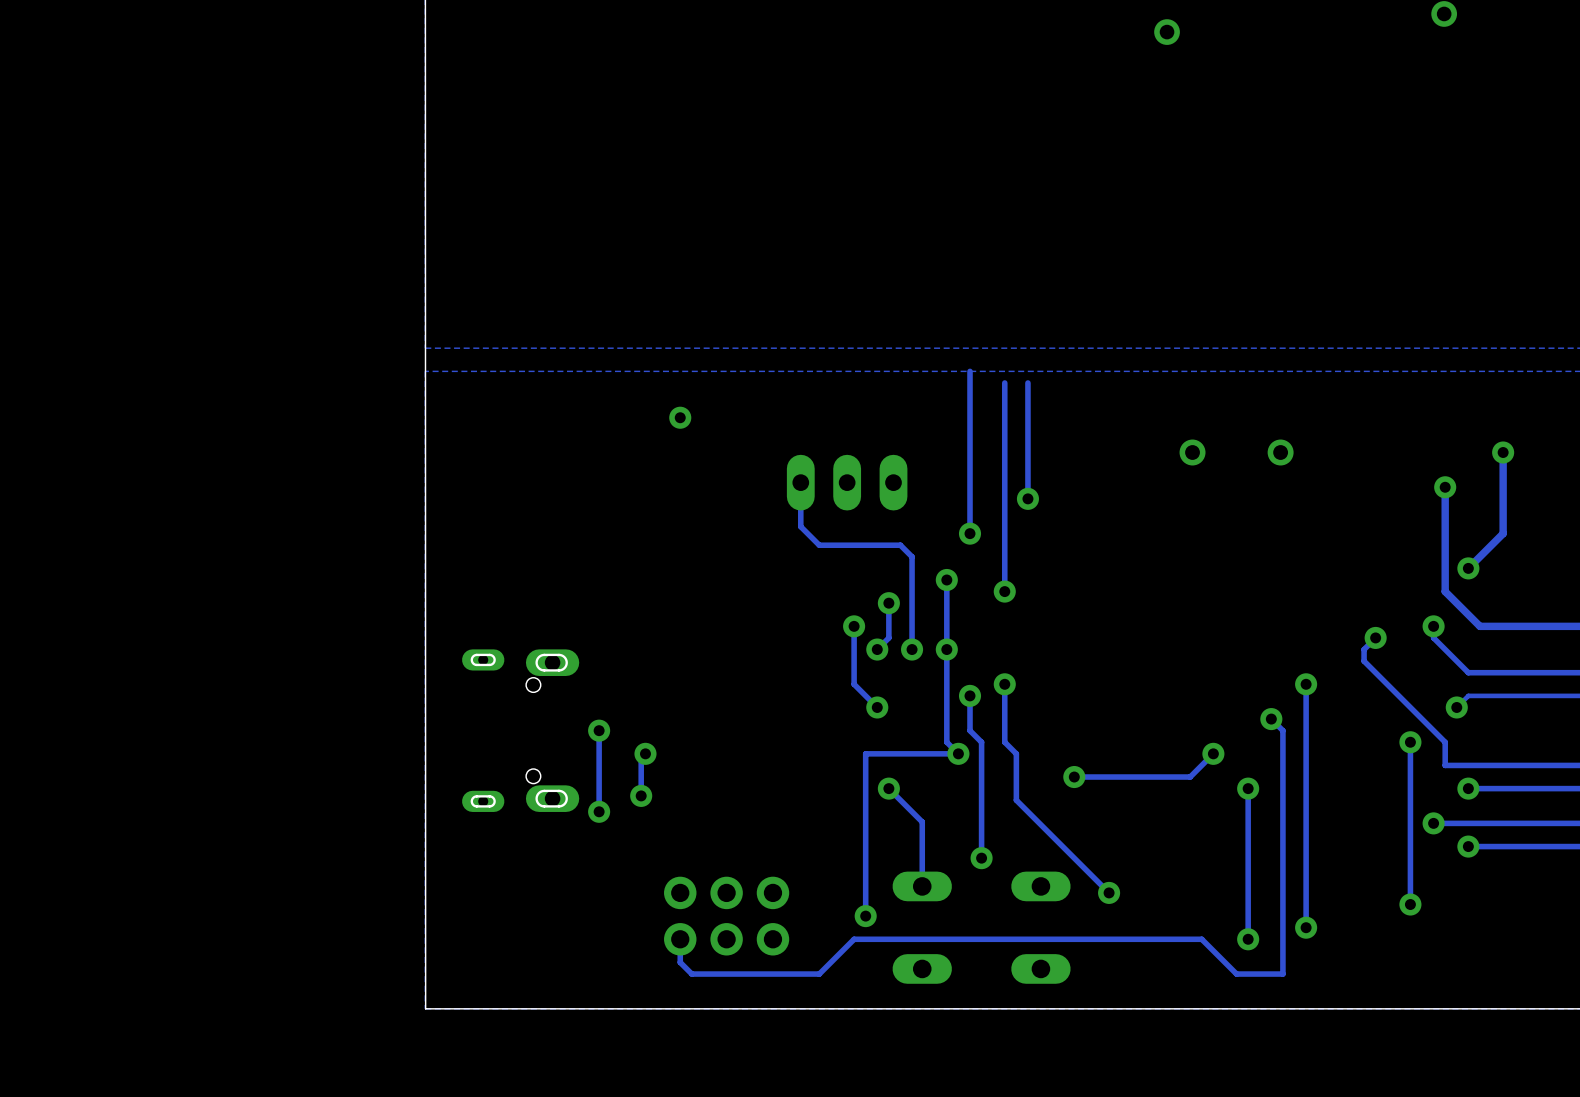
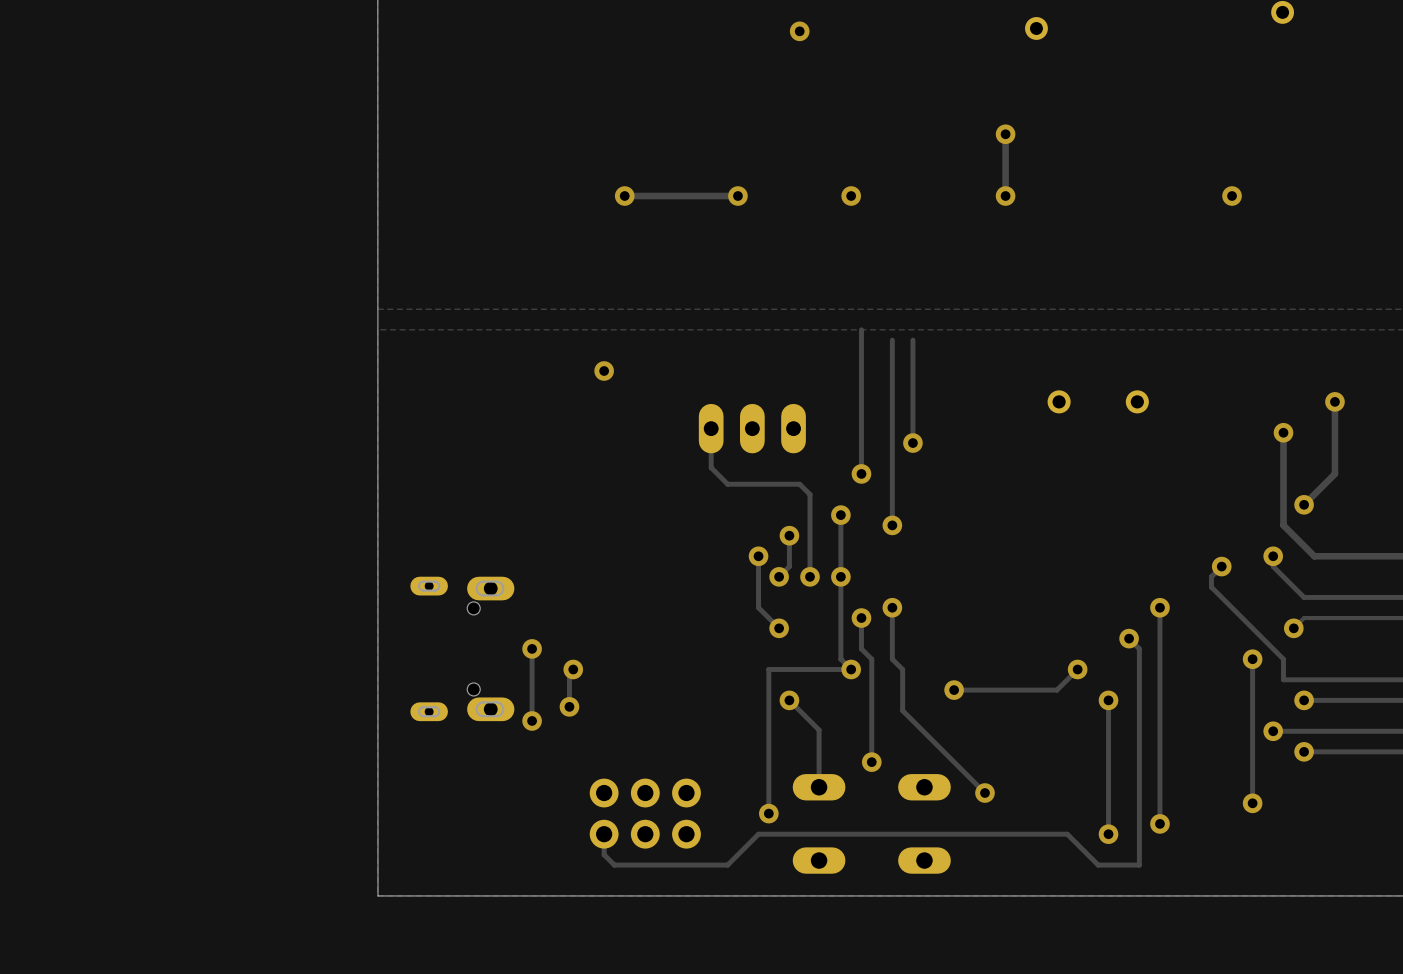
via: none -> (799, 31)
track: none -> (1005, 134) (1005, 196)
via: none -> (1005, 134)
via: none -> (624, 196)
track: none -> (737, 196) (624, 196)
via: none -> (737, 196)
via: none -> (851, 196)
via: none -> (1005, 196)
via: none -> (1232, 196)

